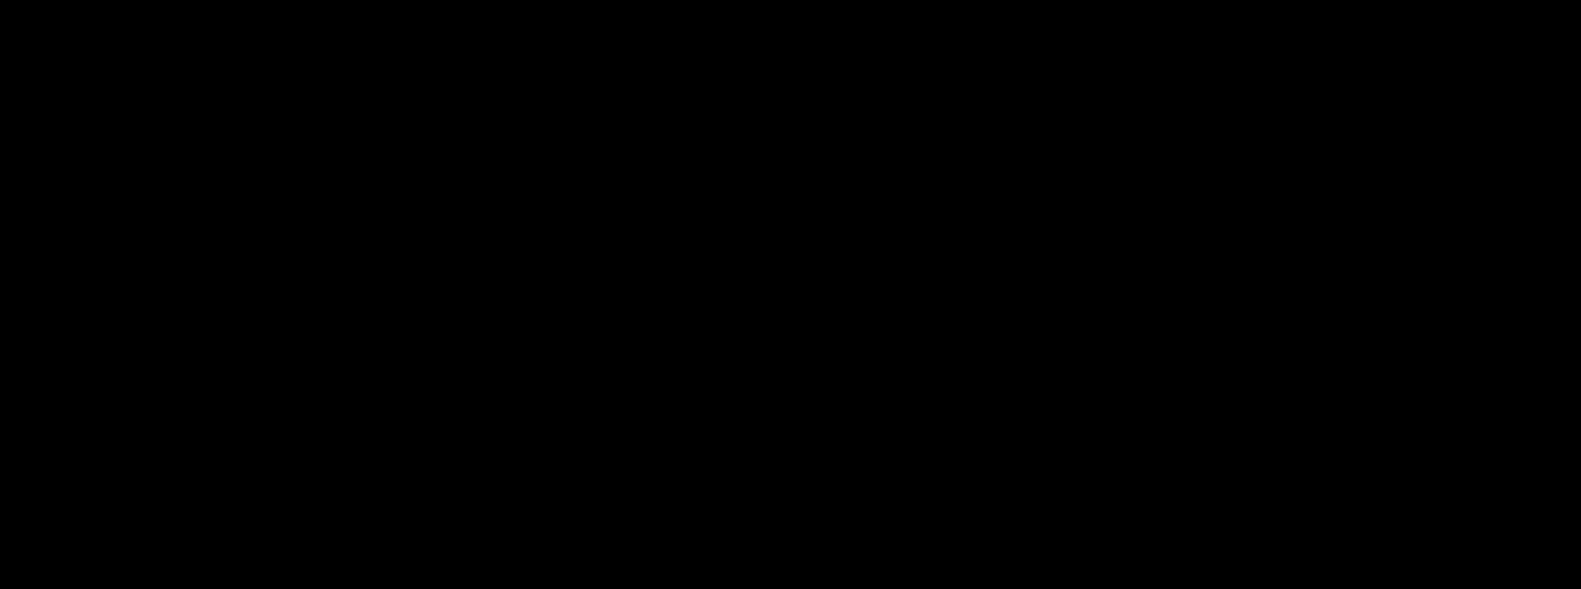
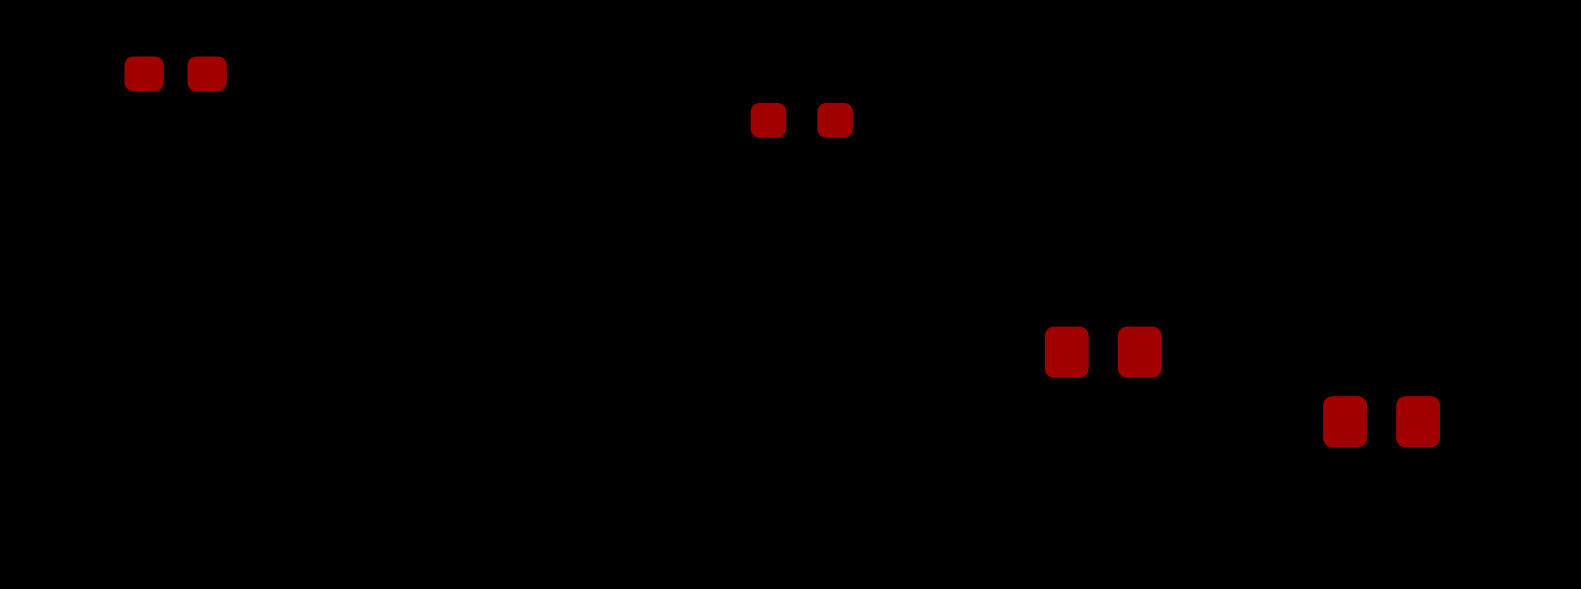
part: none -> (175, 73)
part: none -> (801, 120)
part: none -> (1103, 352)
part: none -> (1381, 421)

